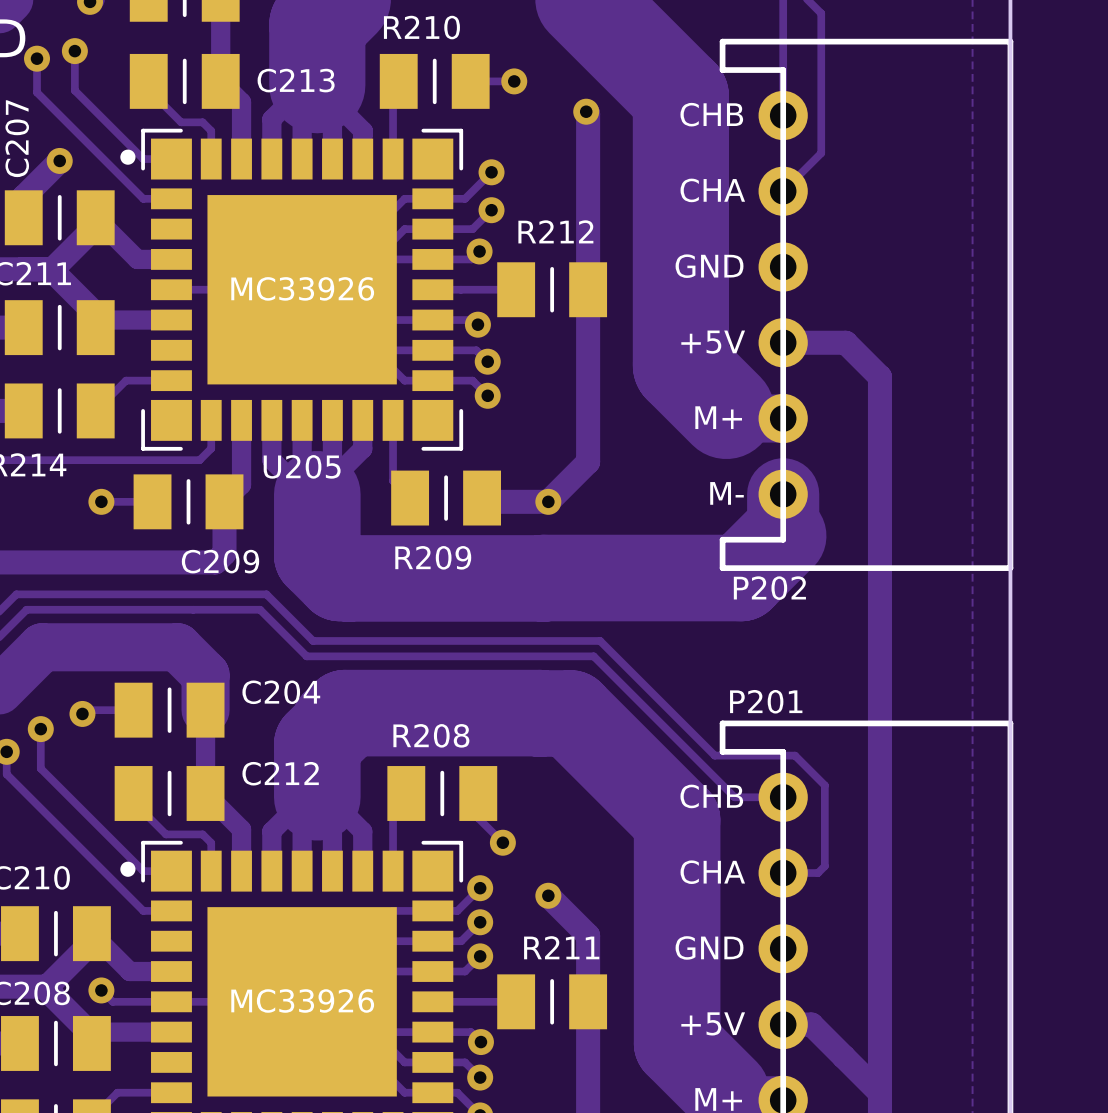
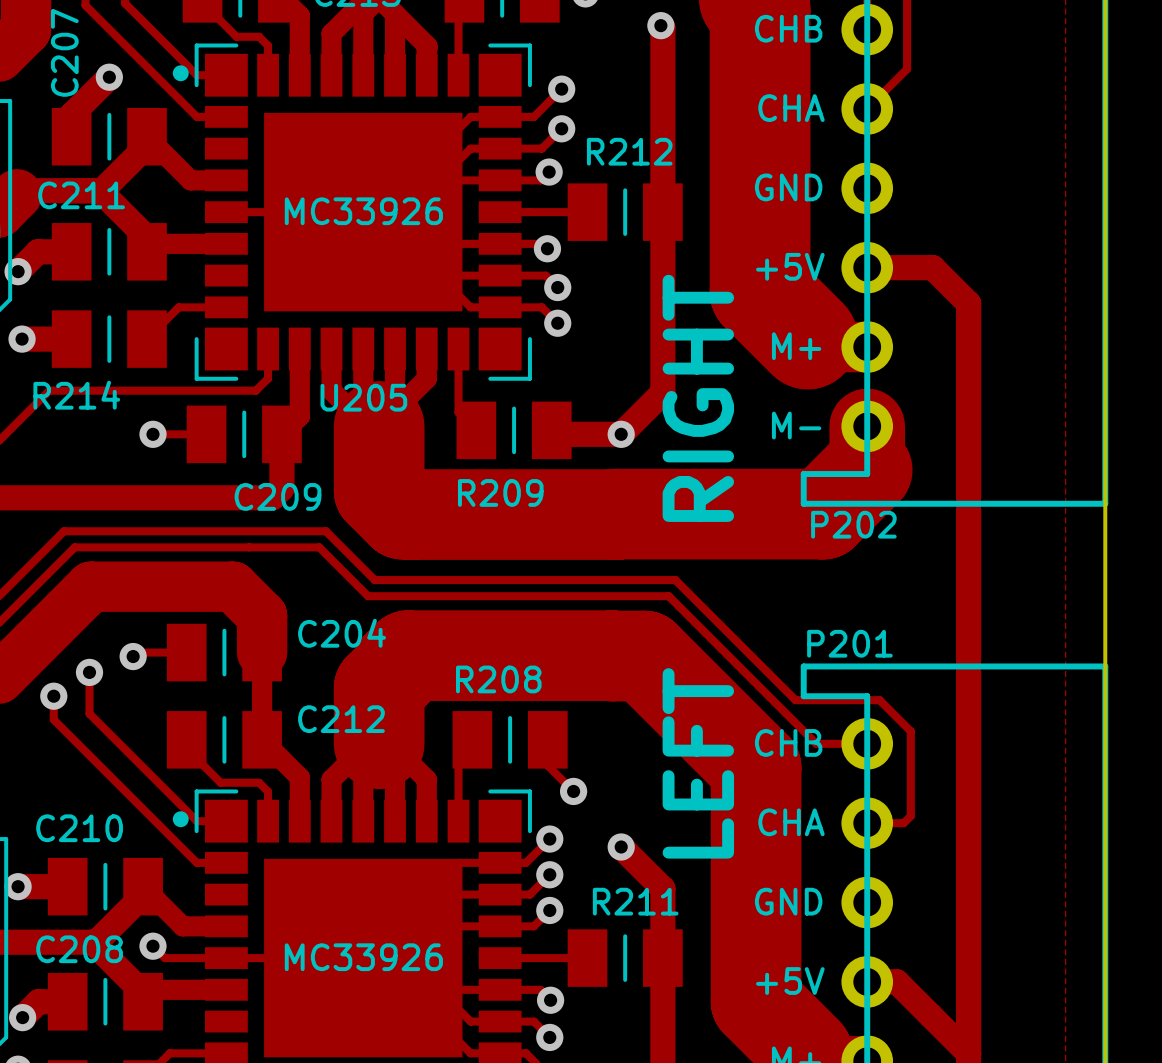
text: none -> RIGHT (698, 398)
text: none -> LEFT (698, 763)

